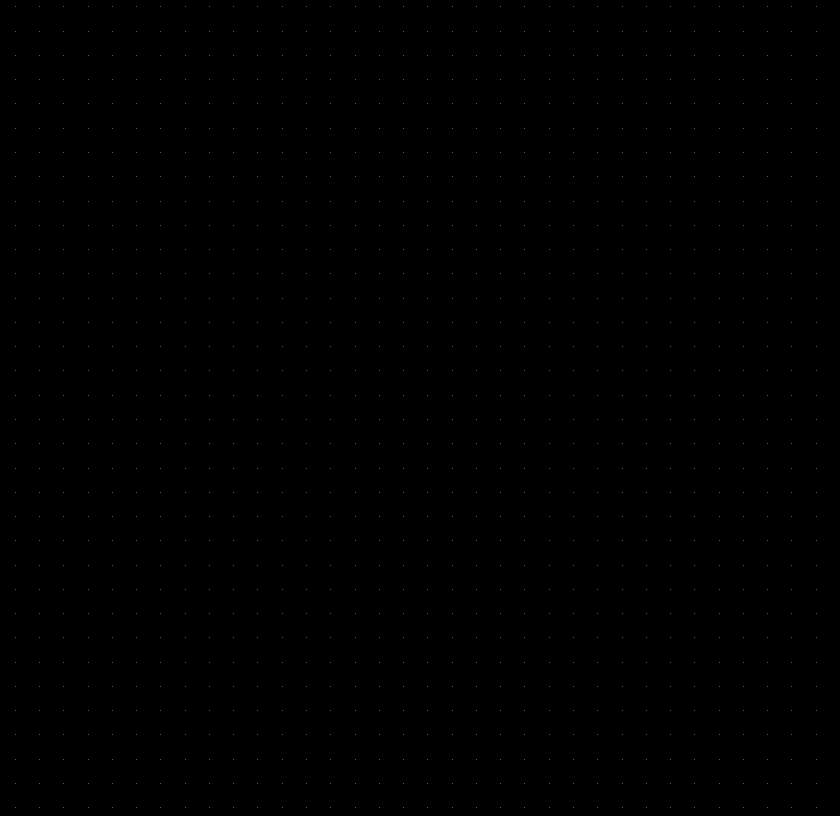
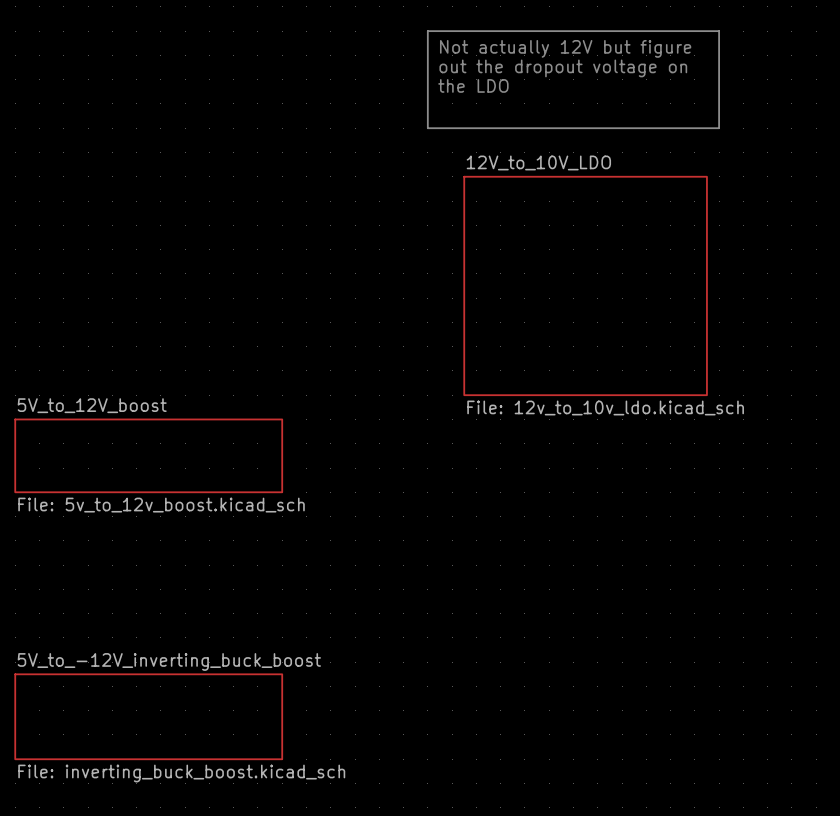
line: none -> (427, 31) (719, 31) (719, 128) (427, 128) (427, 31)
text: none -> Not actually 12V but figure (565, 48)
text: none -> out the dropout voltage on (563, 68)
text: none -> the LDO (473, 85)
sheet 12V_to_10V_LDO: none -> File: 12v_to_10v_ldo.kicad_sch (585, 285)
sheet 5V_to_12V_boost: none -> File: 5v_to_12v_boost.kicad_sch (148, 455)
sheet 5V_to_-12V_inverting_buck_boost: none -> File: inverting_buck_boost.kicad_sch (148, 716)

